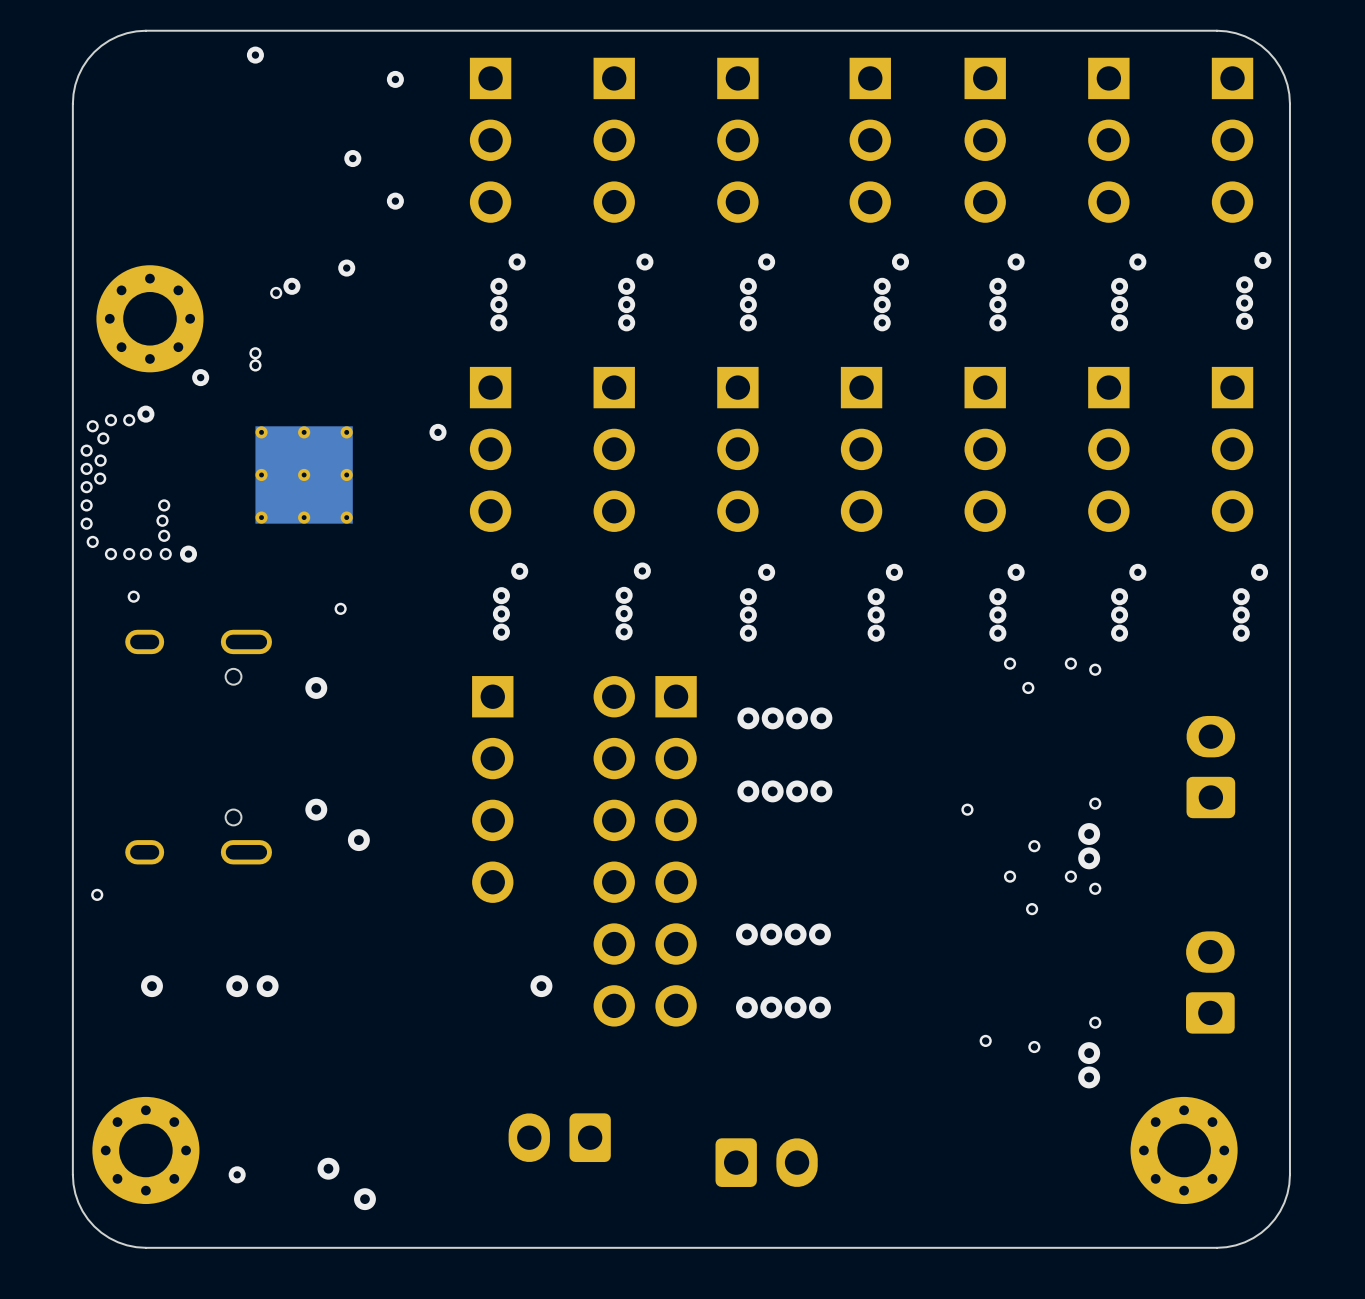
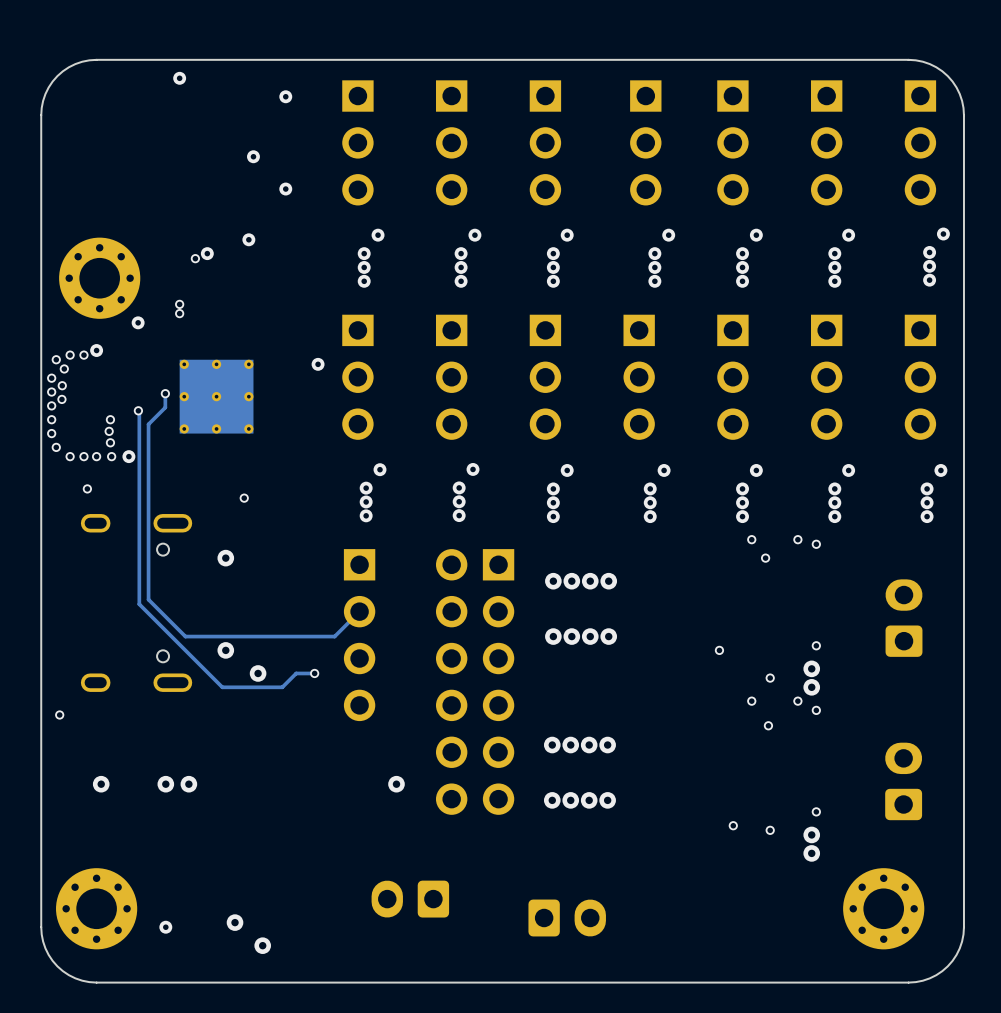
track: none -> (165, 393) (165, 407) (148, 424) (148, 599) (185, 636) (334, 636) (359, 611)
via: none -> (165, 393)
track: none -> (138, 410) (139, 604) (222, 687) (282, 687) (296, 673) (314, 673)
via: none -> (138, 410)
via: none -> (314, 673)

